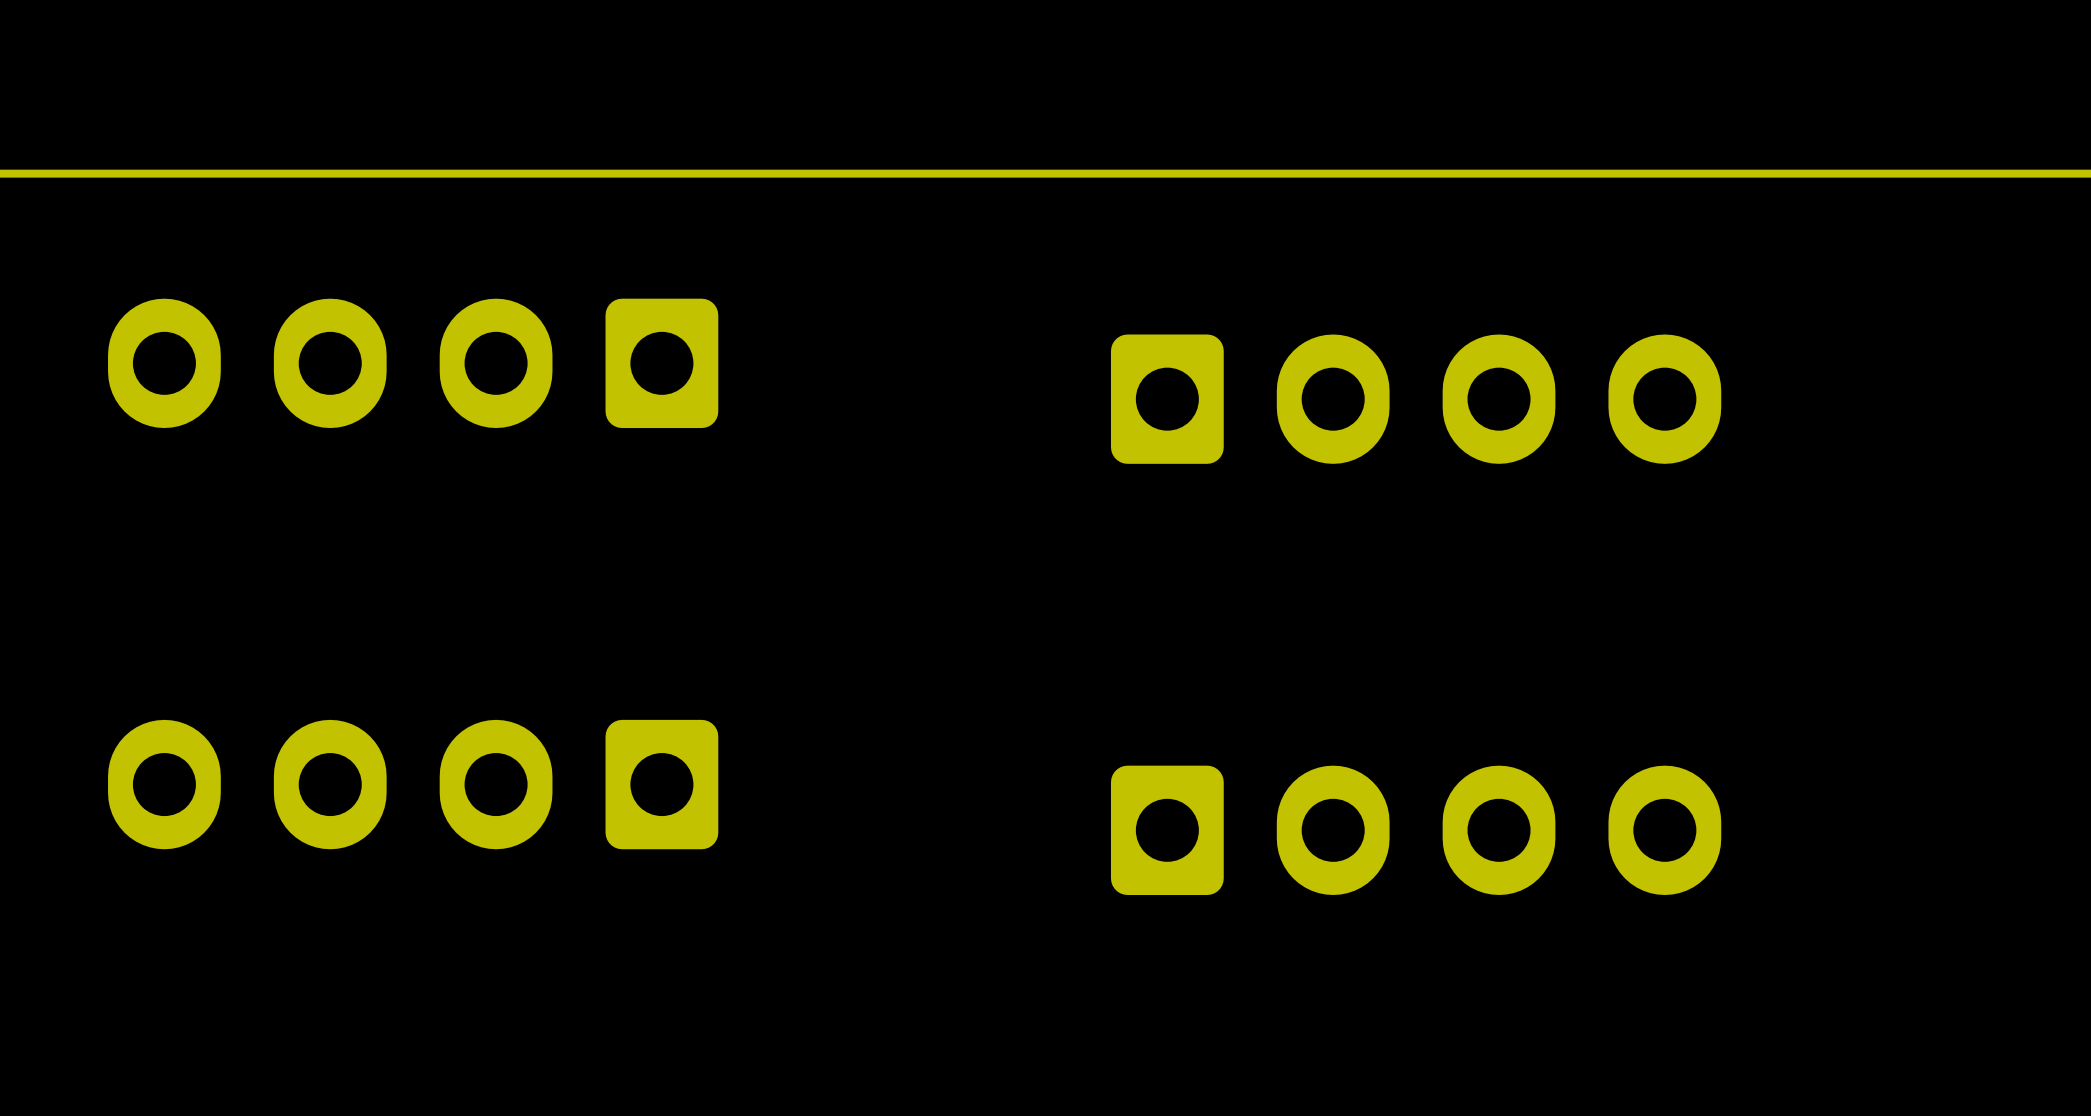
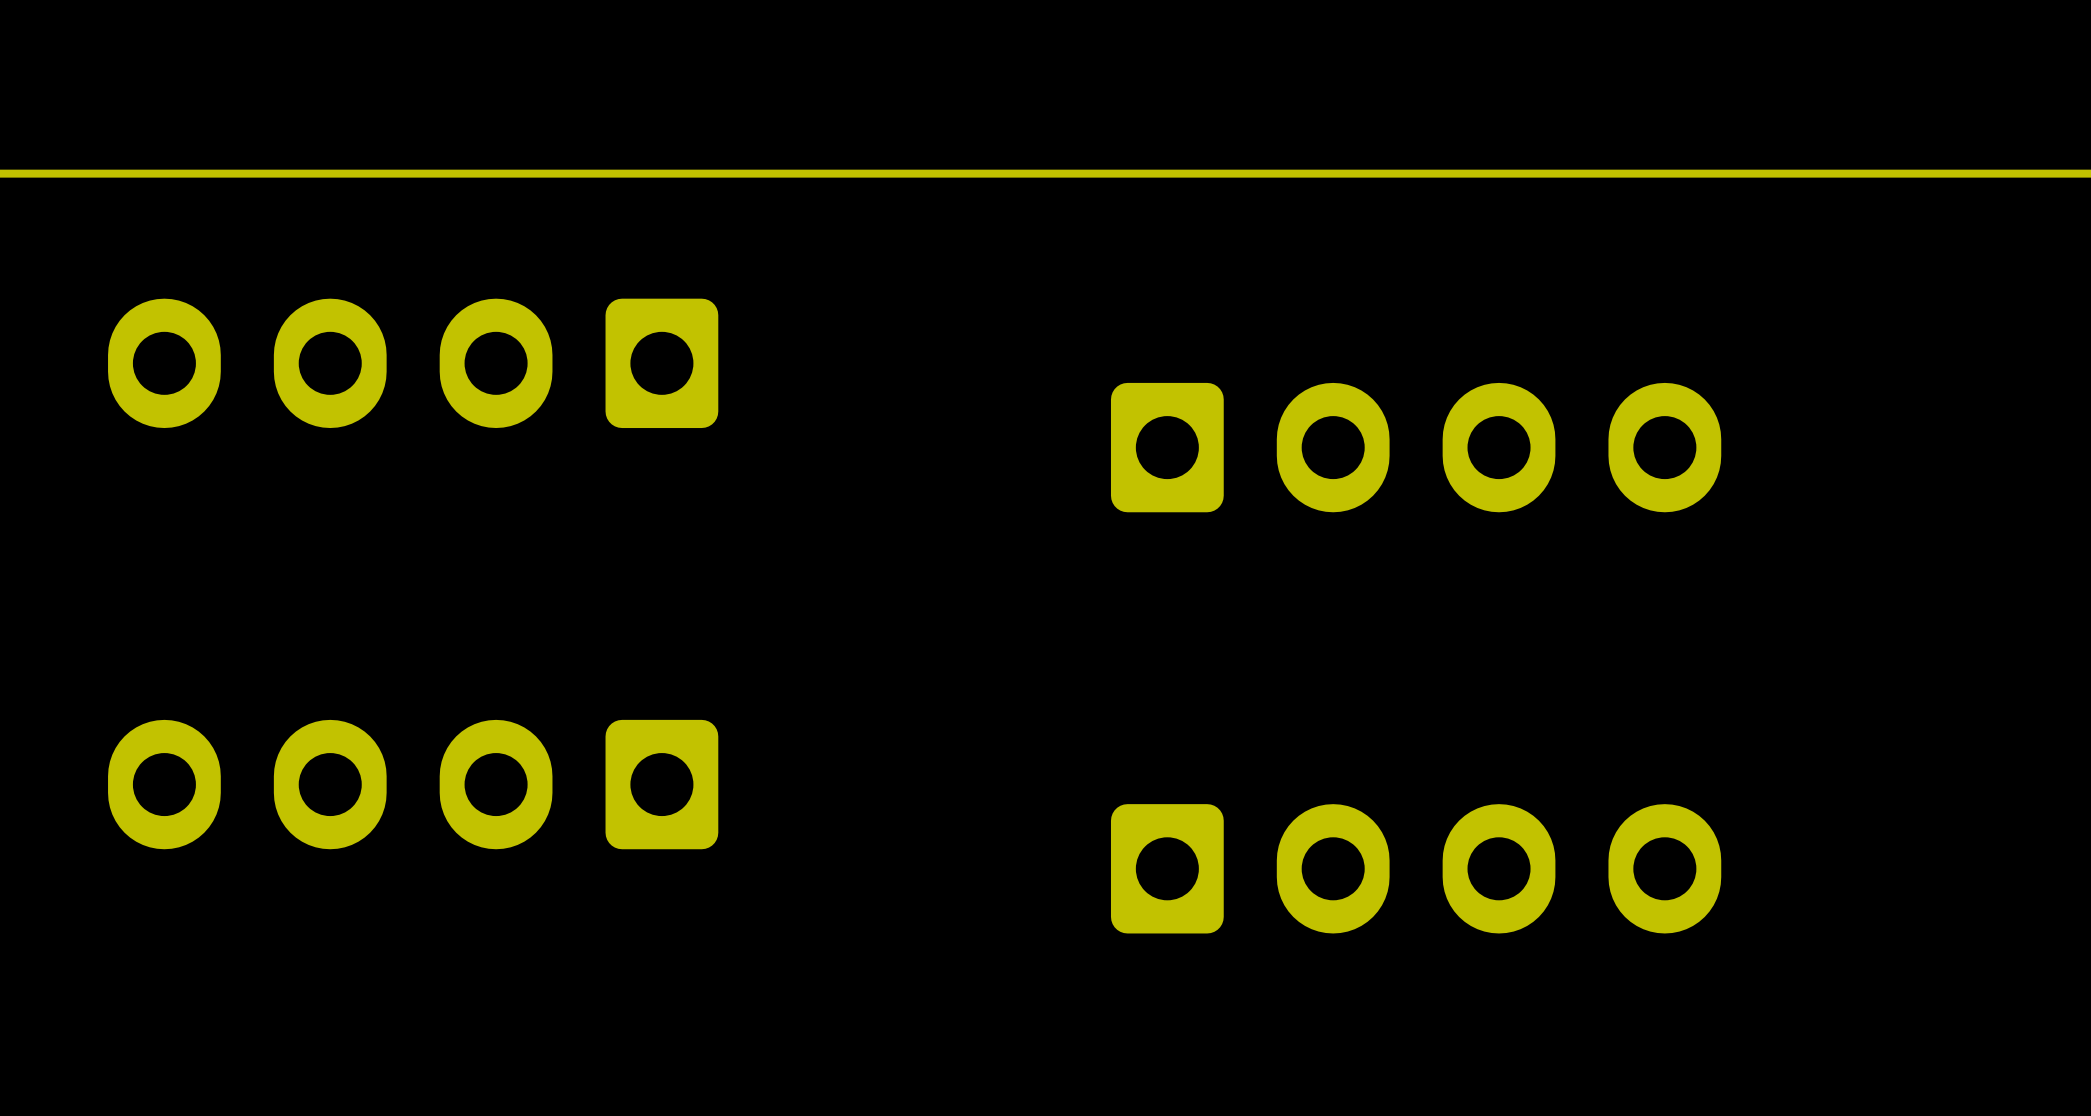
part position: (1416, 399) -> (1416, 447)
part position: (1416, 830) -> (1416, 868)

